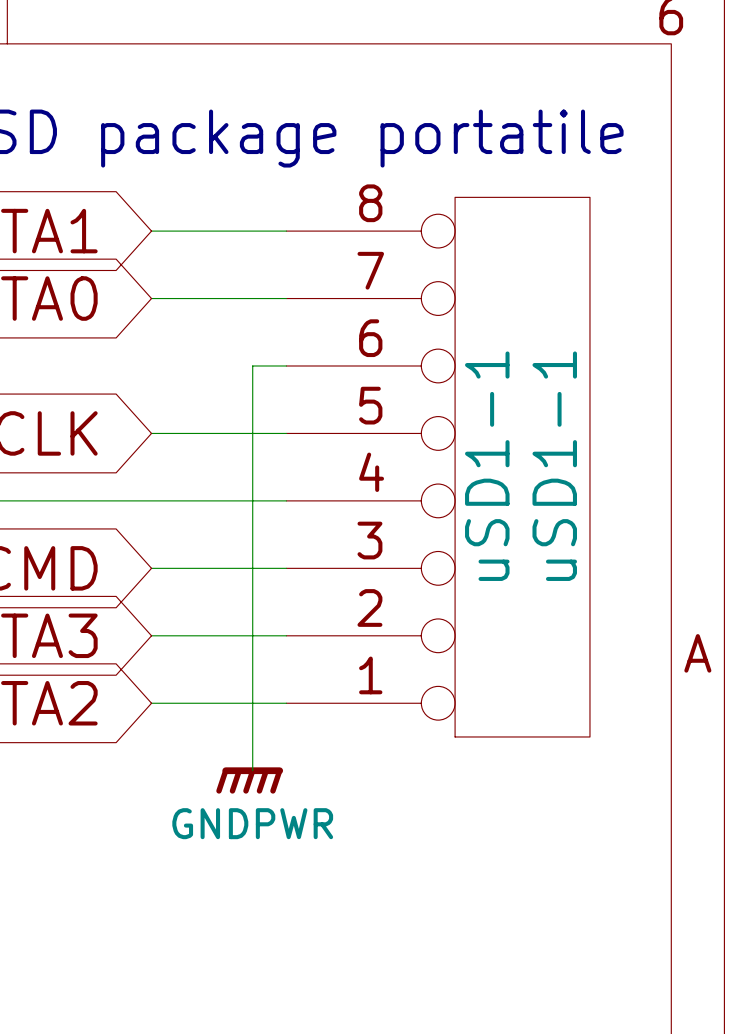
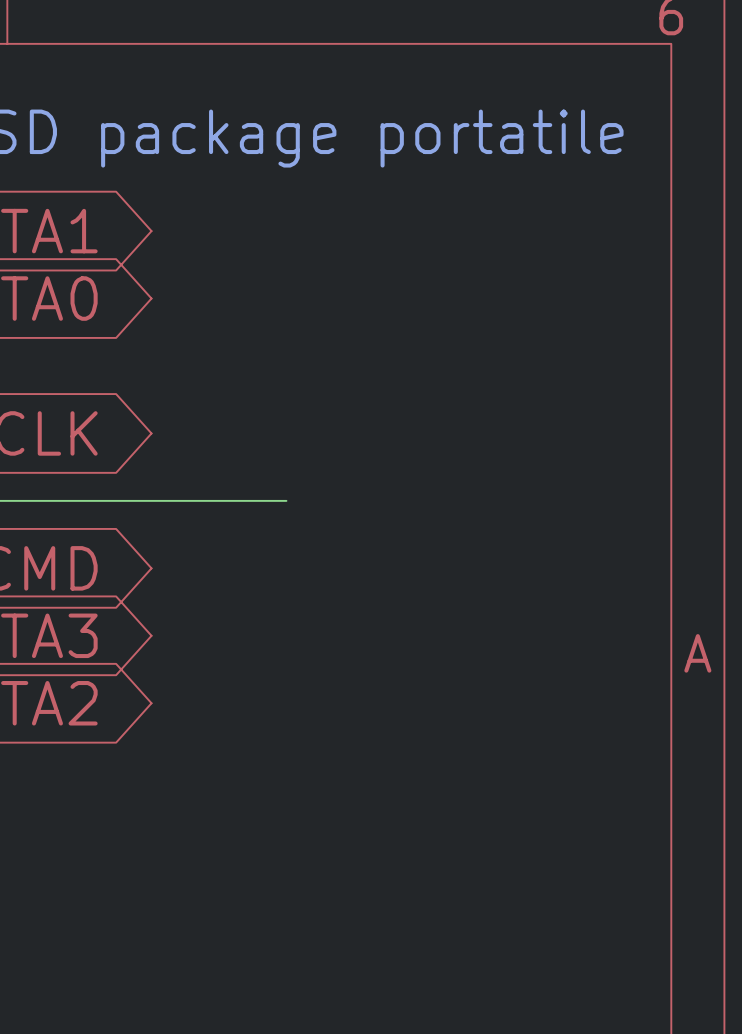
wire: (151, 231) (286, 231) -> none
wire: (151, 298) (286, 298) -> none
wire: (286, 365) (252, 365) (252, 770) -> none
wire: (151, 433) (286, 433) -> none
uSD1-1: uSD1-1 (438, 467) -> none
wire: (151, 568) (286, 568) -> none
wire: (151, 635) (286, 635) -> none
wire: (151, 703) (286, 703) -> none
power symbol: GNDPWR (249, 780) -> none

